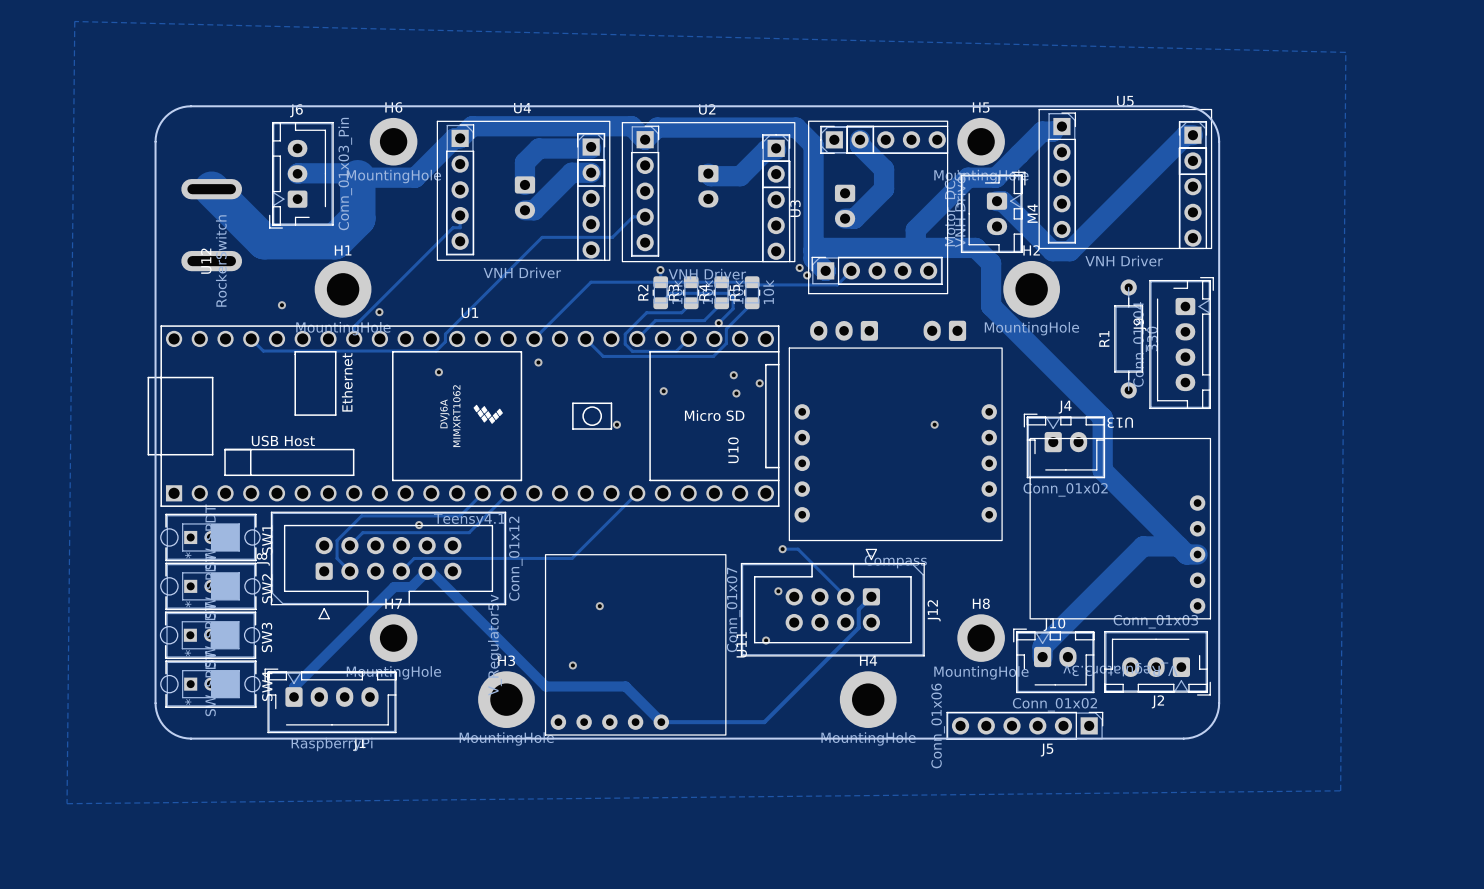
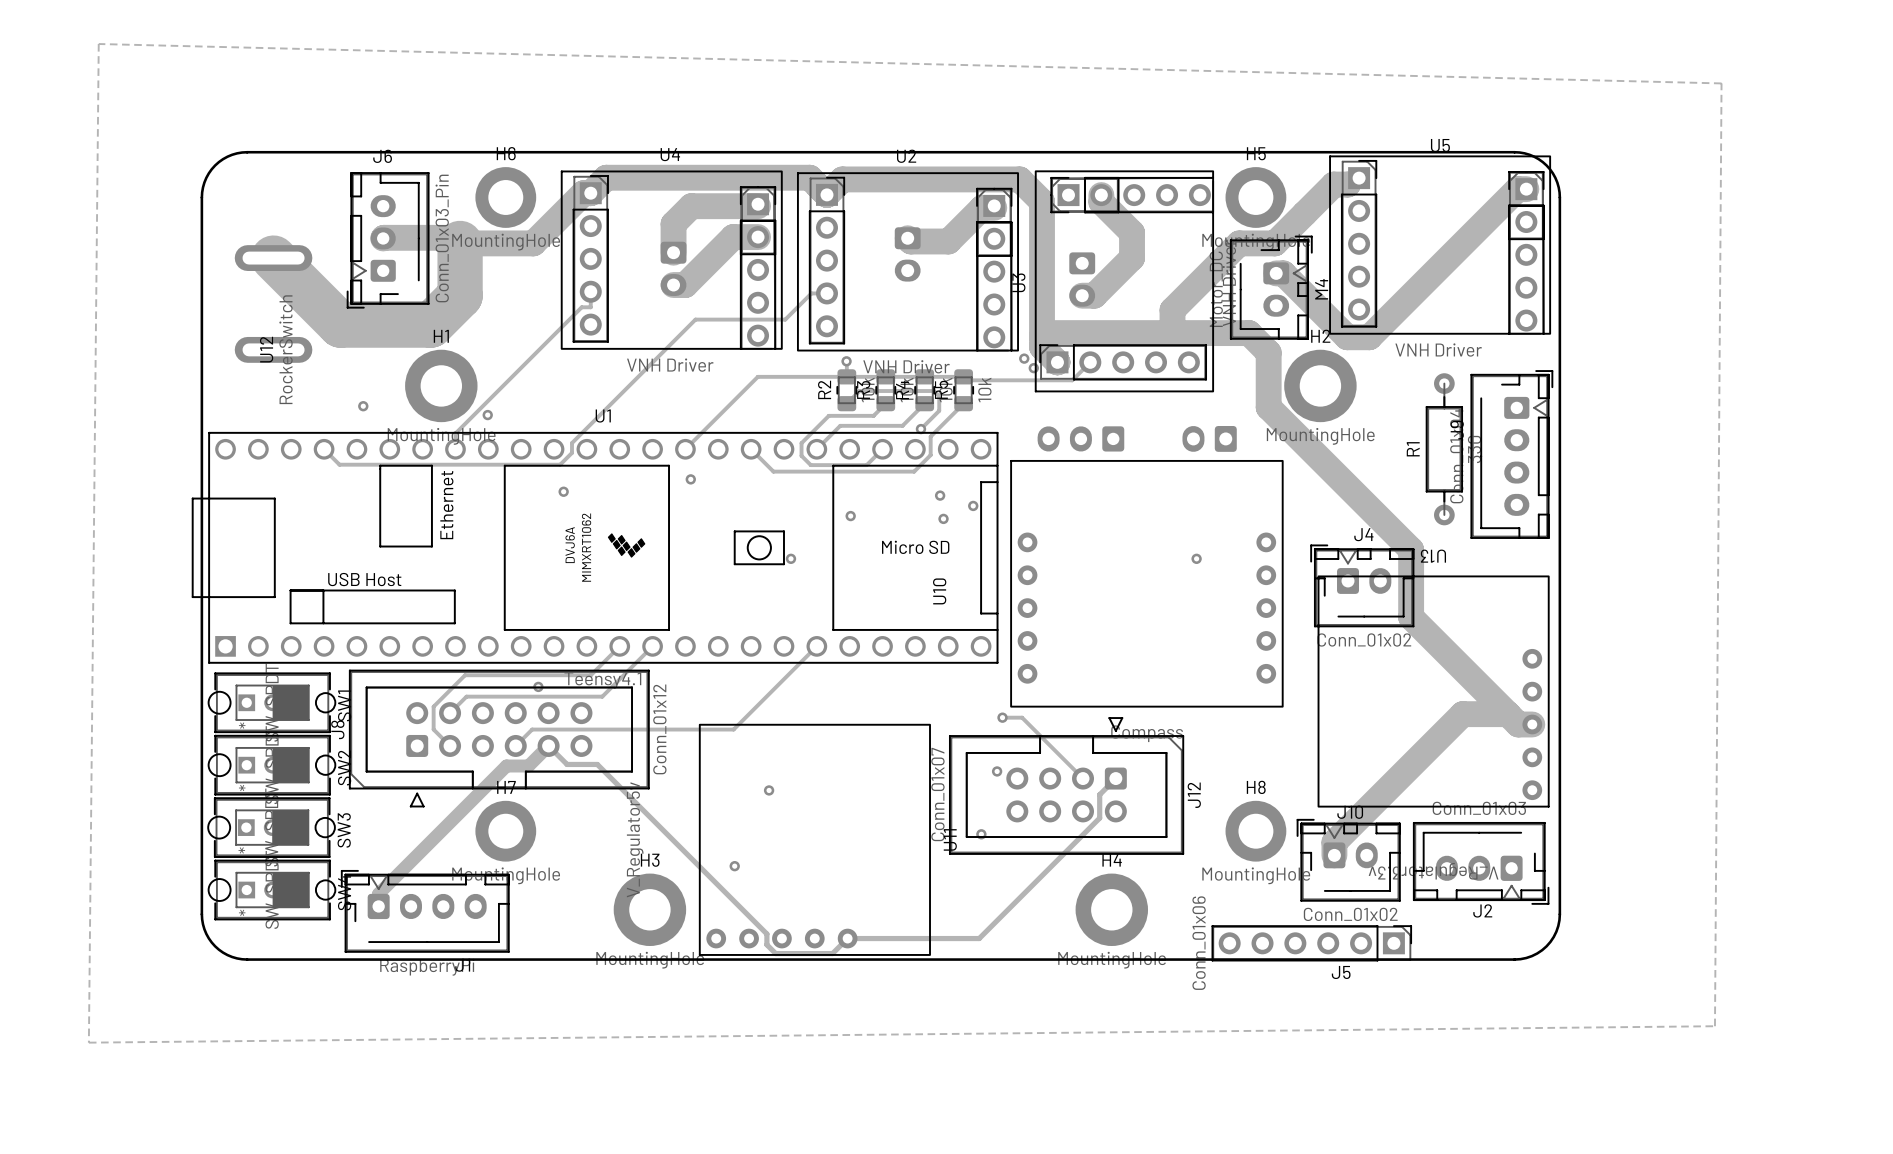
track: (427, 571) (430, 571) (545, 686) (625, 686) (661, 722) -> (548, 745) (567, 764) (597, 764) (766, 933) (766, 944) (775, 953) (832, 953) (847, 938)

